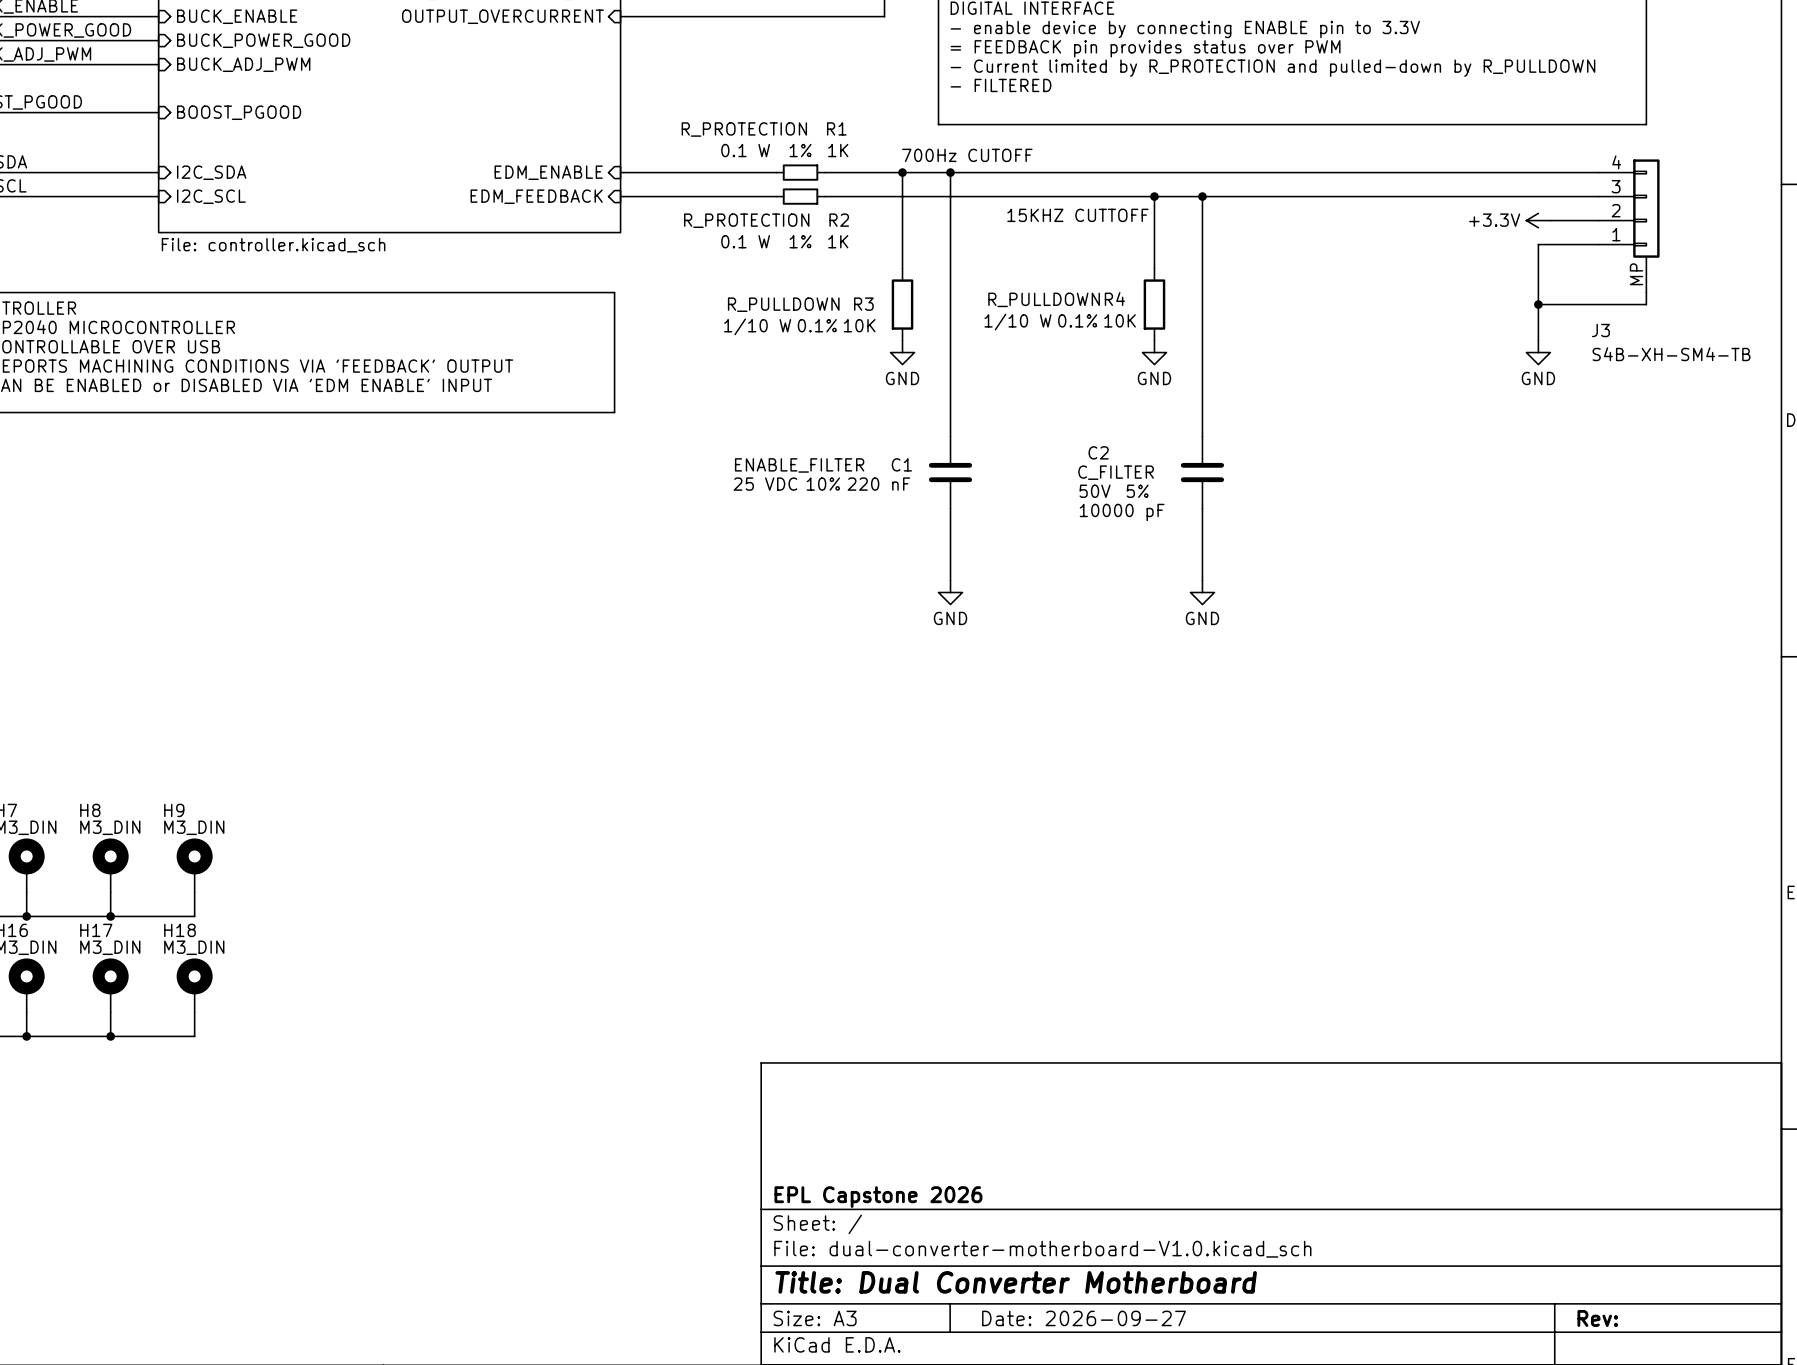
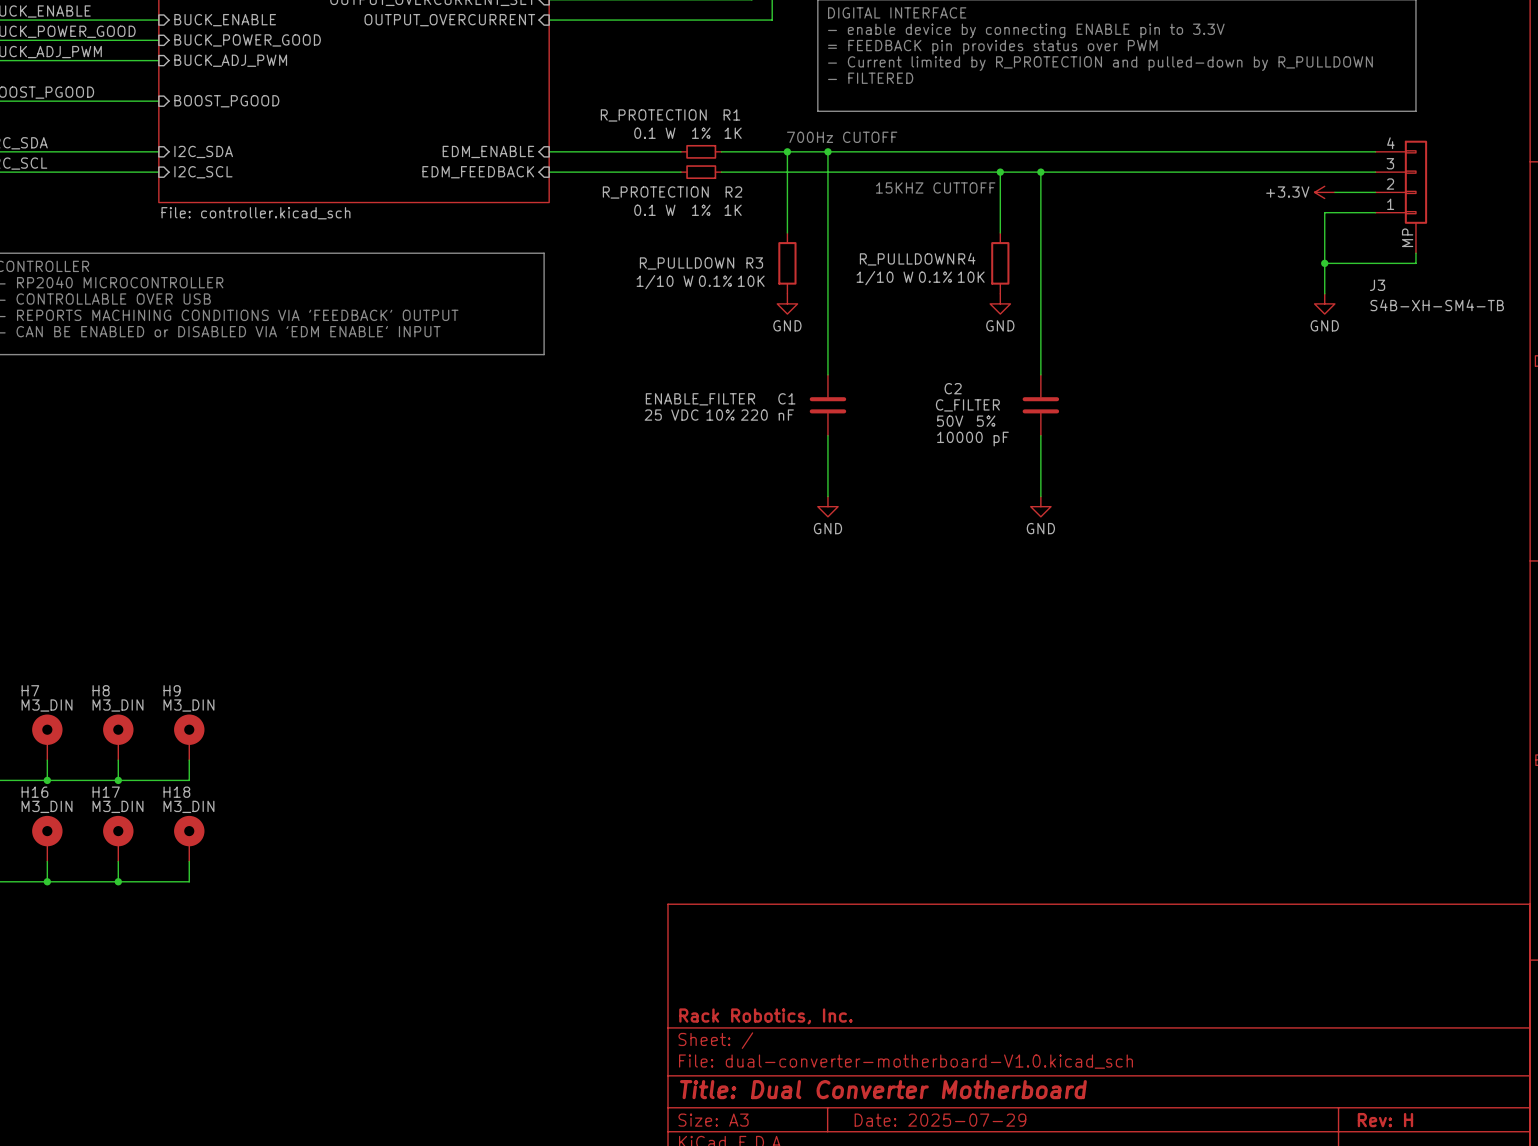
title block: EPL Capstone 2026 (878, 1197) -> Rack Robotics, Inc. (765, 1016)
title block: Date: 2026-09-27 (1084, 1318) -> Date: 2025-07-29 (940, 1120)
title block: Rev: (1597, 1318) -> Rev: H (1385, 1120)

